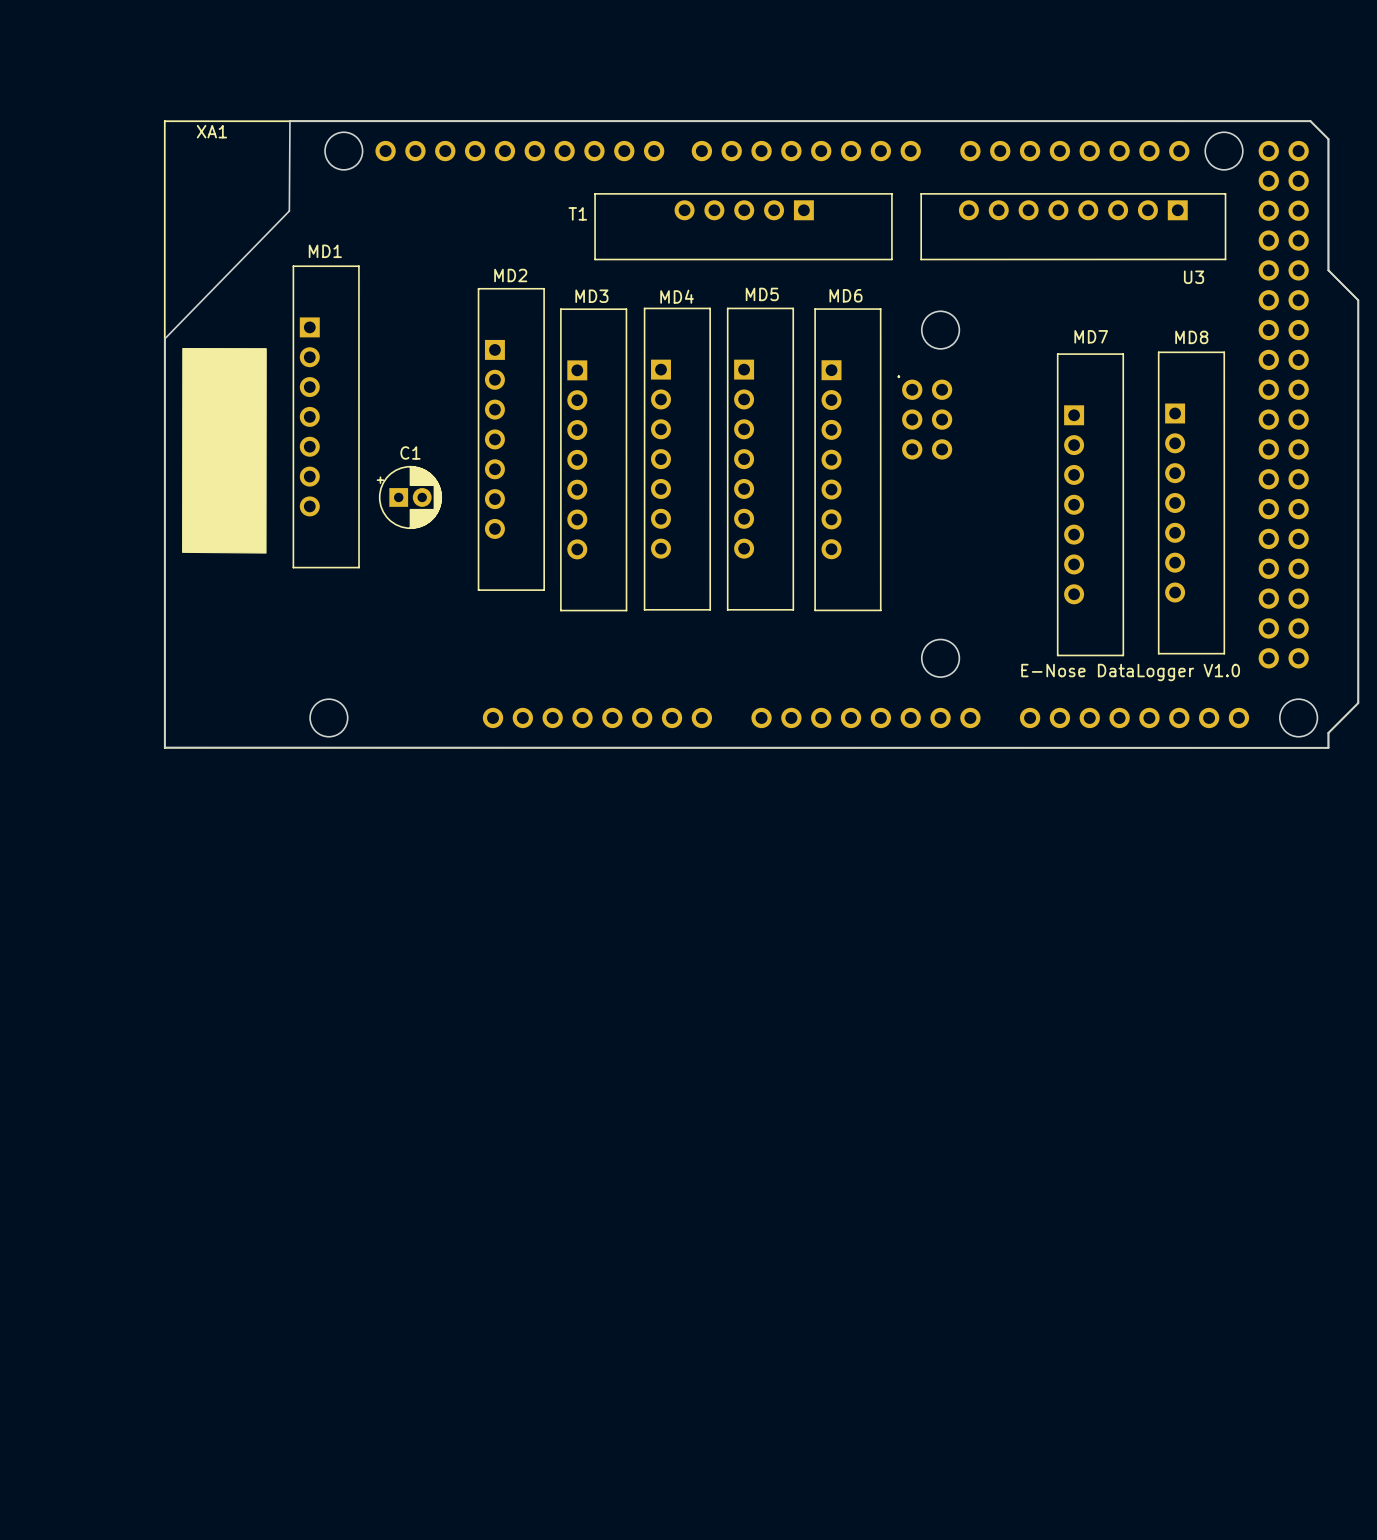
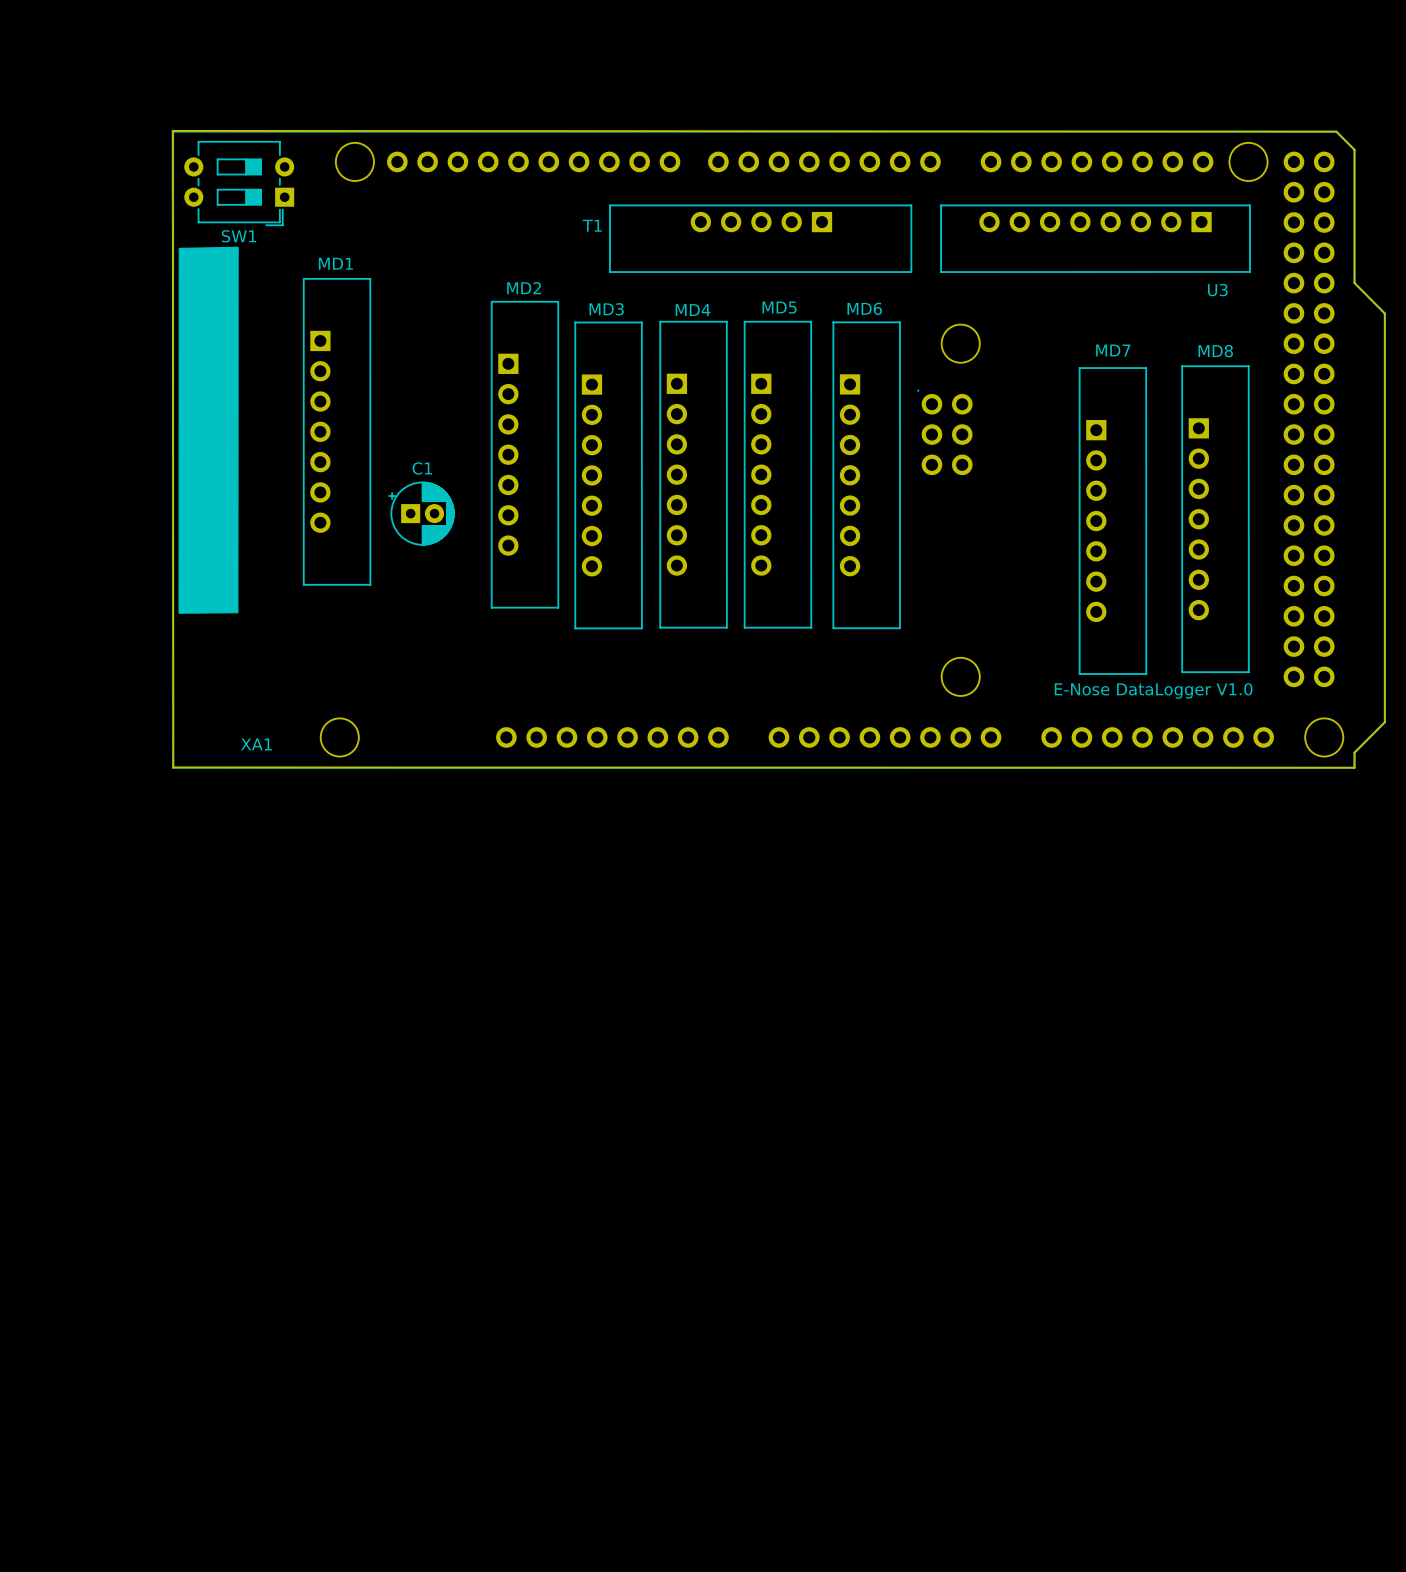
board edge: (1310, 121) (289, 121) (289, 211) (164, 338) (164, 747) -> (1336, 131) (172, 130) (173, 767)
XA1 name position: XA1 (211, 131) -> XA1 (256, 744)
SW1: none -> (239, 183)
drawing: none -> [178, 246, 239, 614]
drawing: [182, 347, 267, 554] -> none

